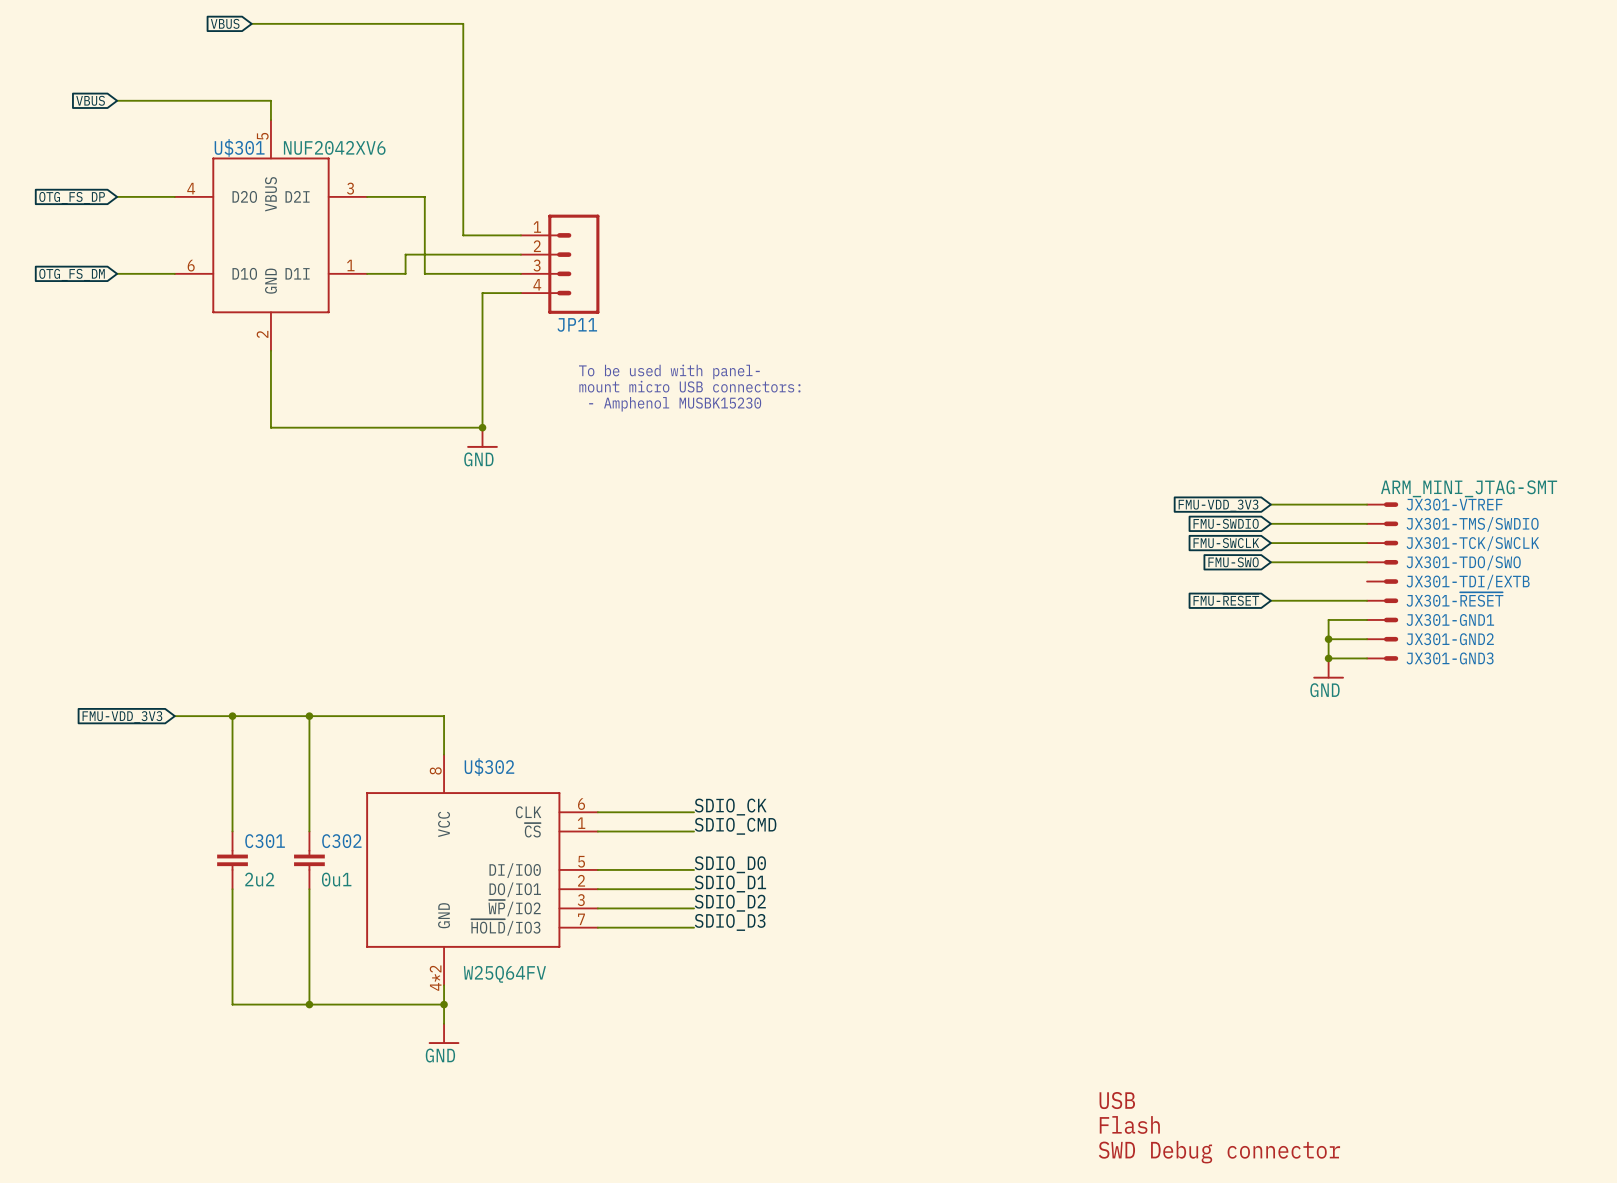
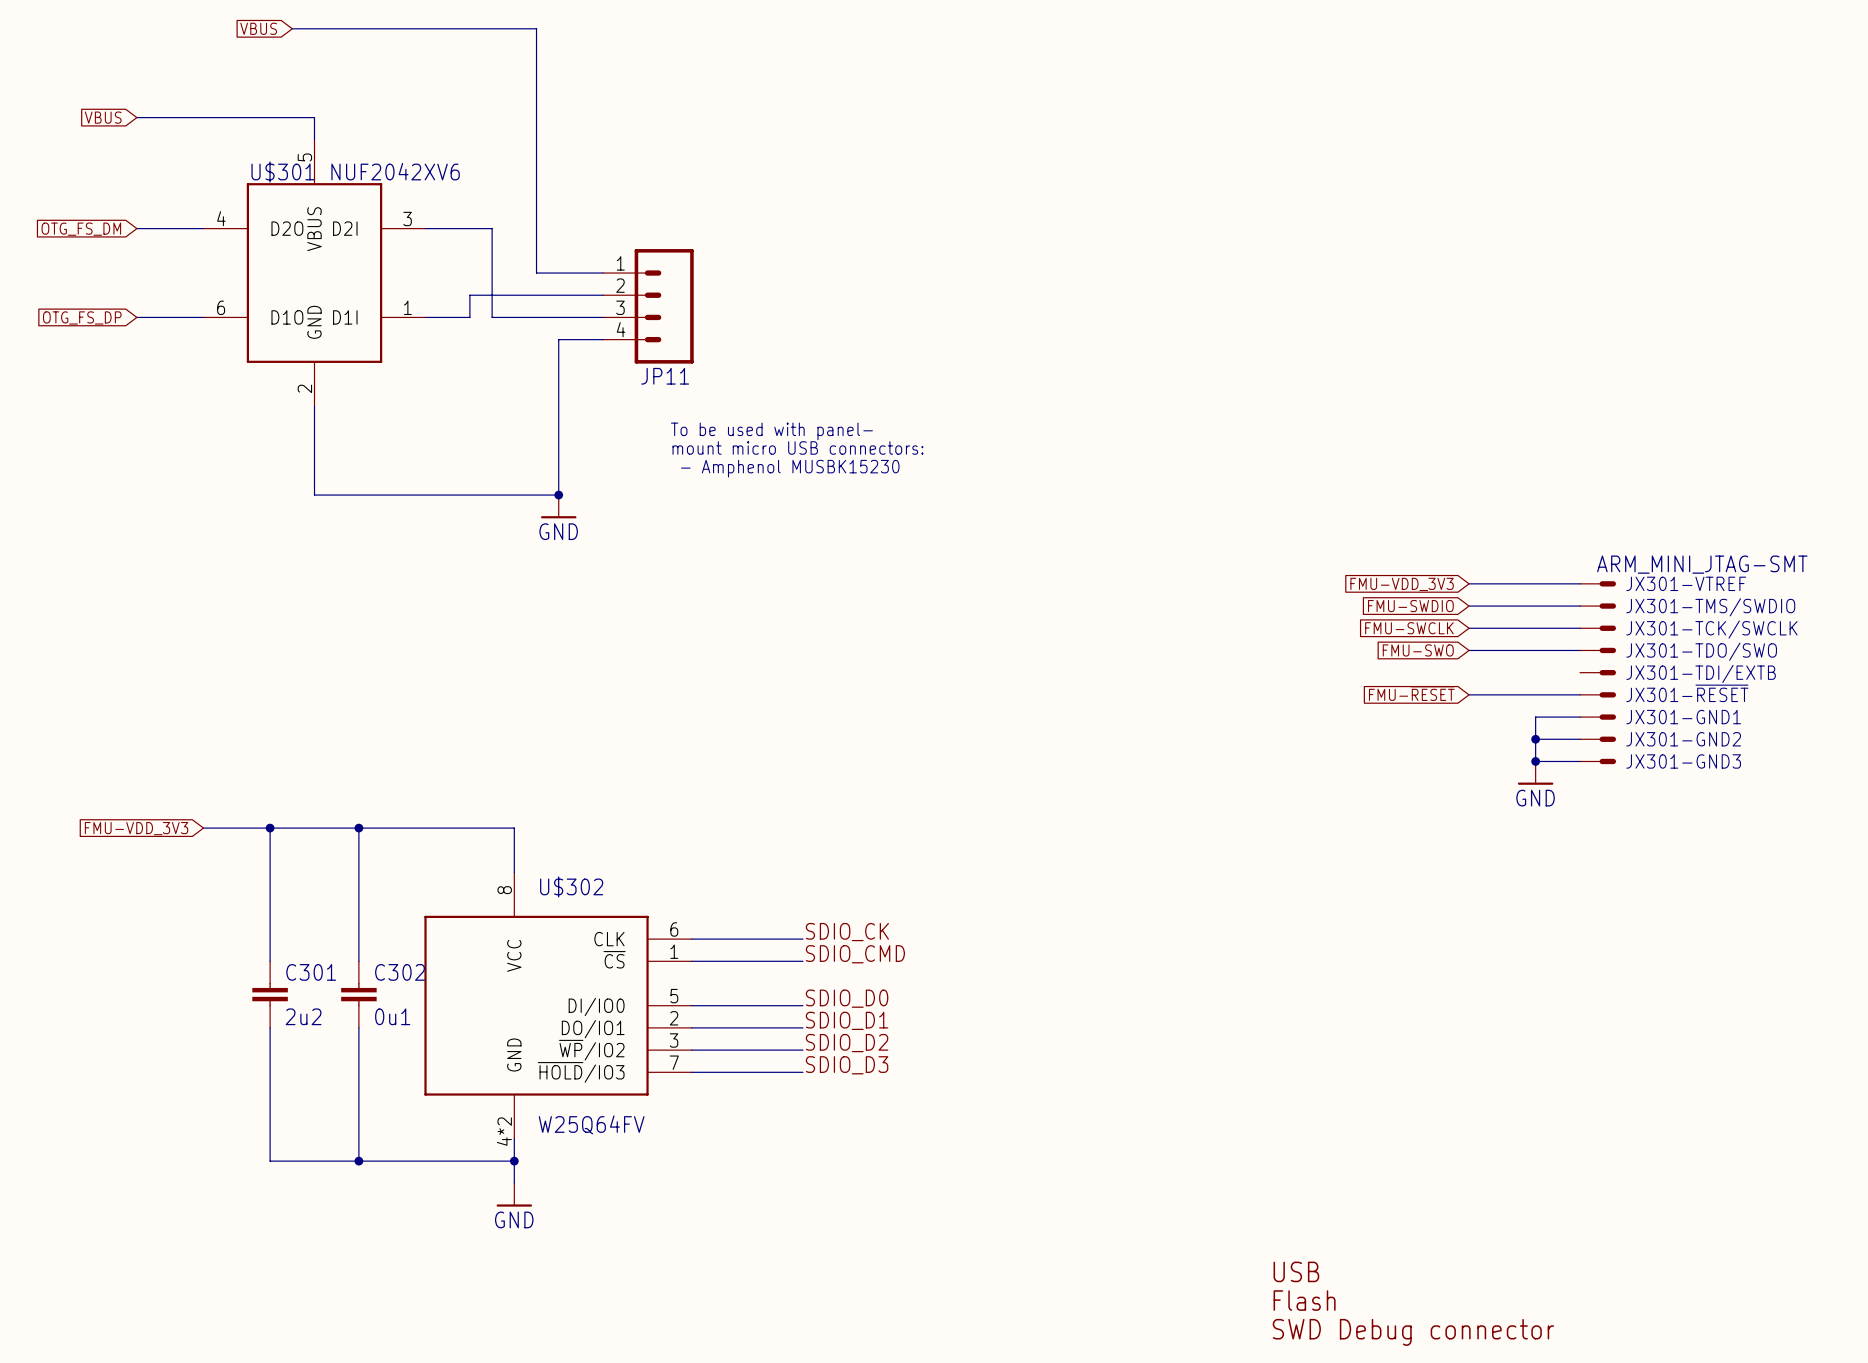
global label: OTG_FS_DP (72, 198) -> OTG_FS_DM (81, 229)
global label: OTG_FS_DM (72, 274) -> OTG_FS_DP (82, 317)

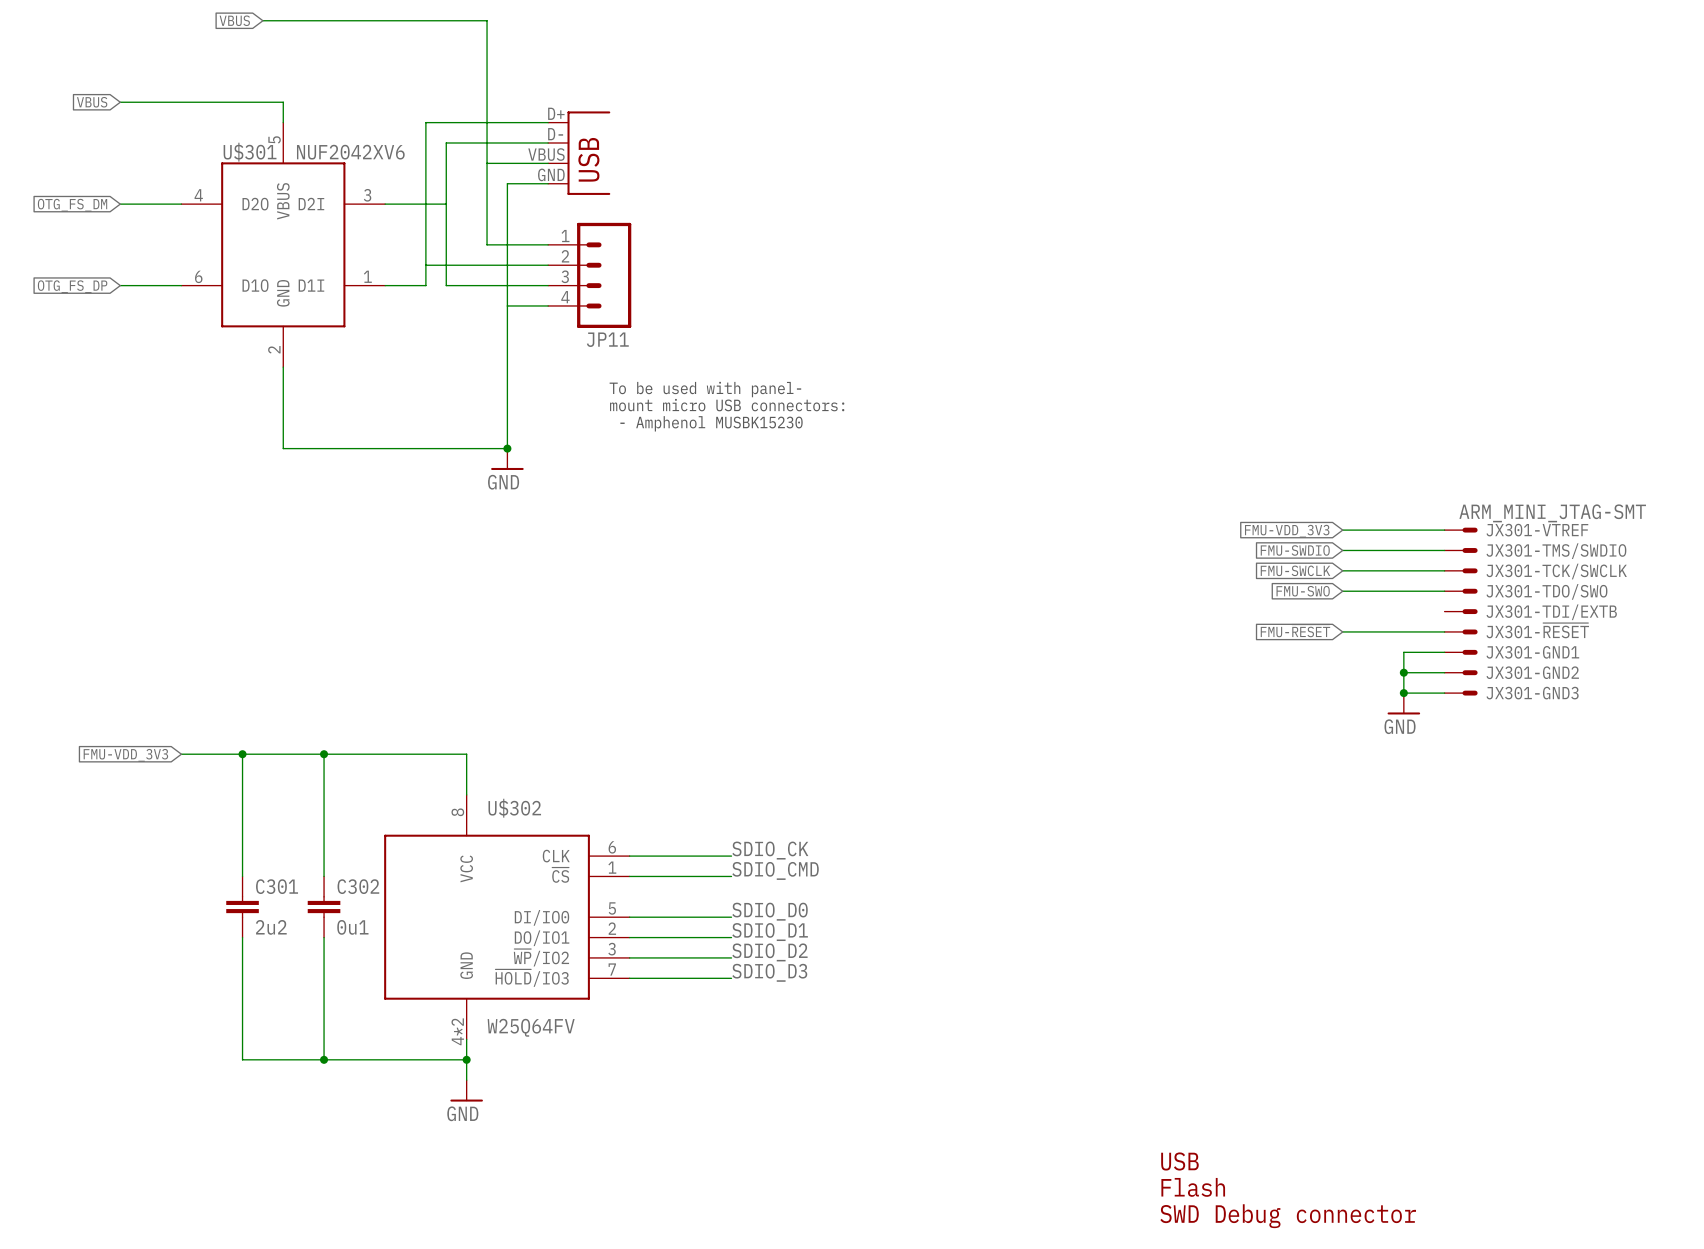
wire: none -> (548, 122) (425, 122) (425, 265)
wire: none -> (548, 142) (446, 142) (446, 204)
part: none -> (579, 153)
wire: none -> (487, 163) (548, 163)
wire: none -> (548, 183) (507, 183) (507, 305)

